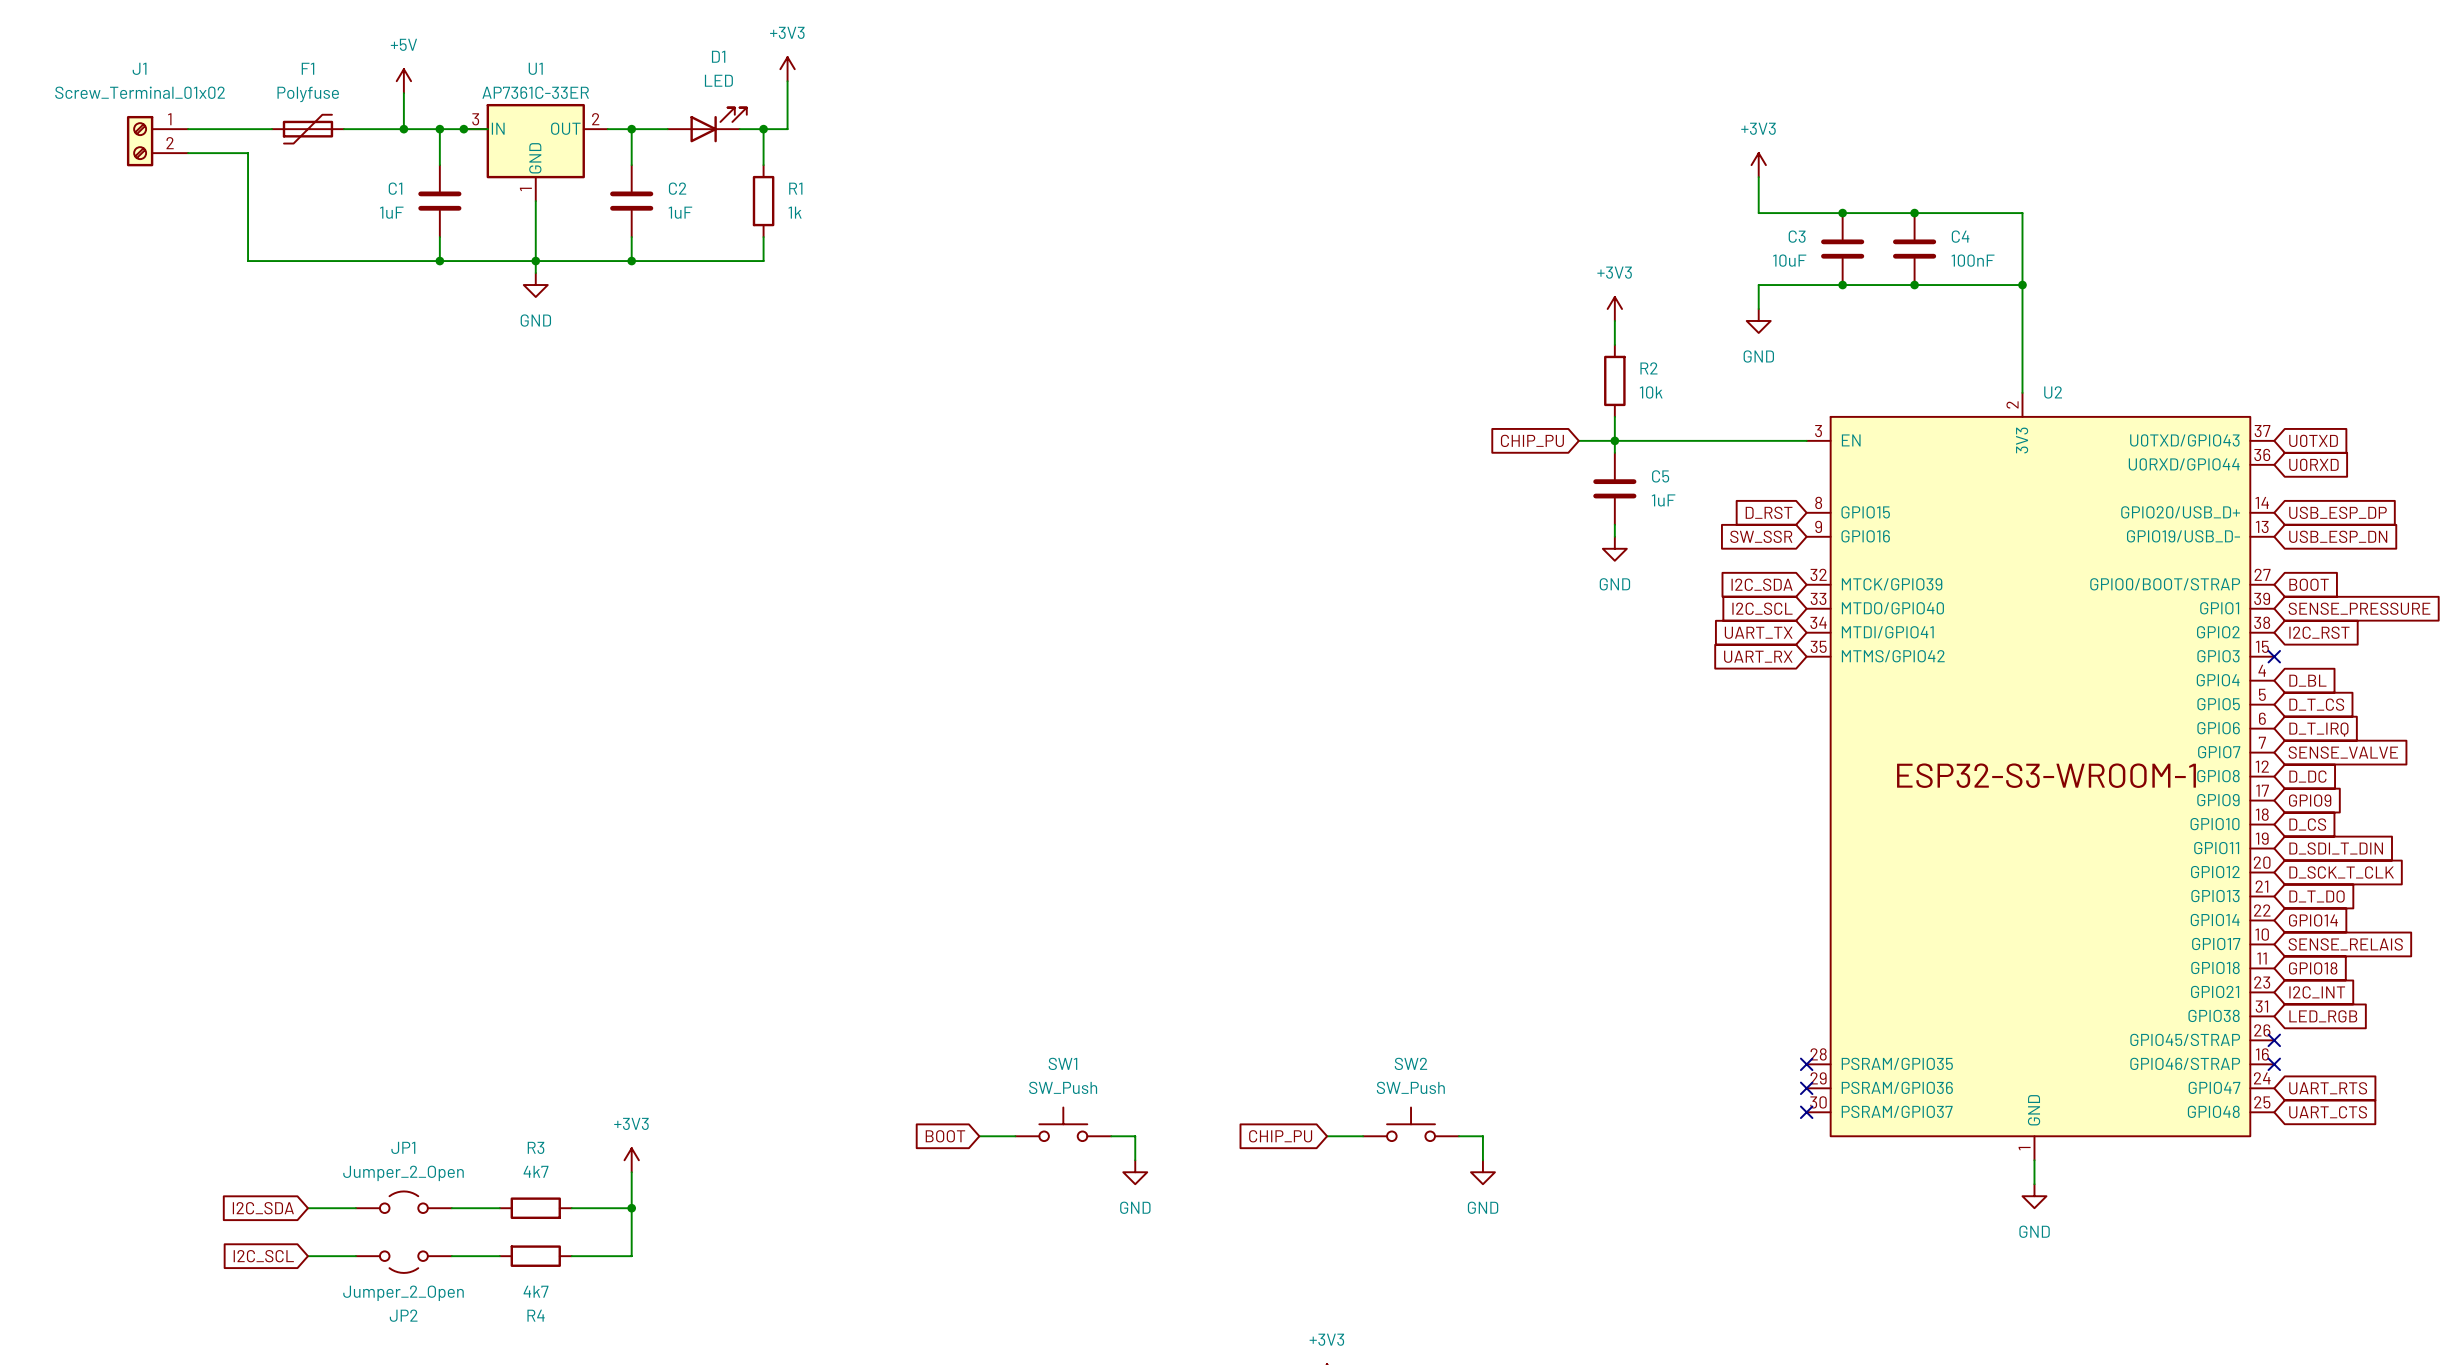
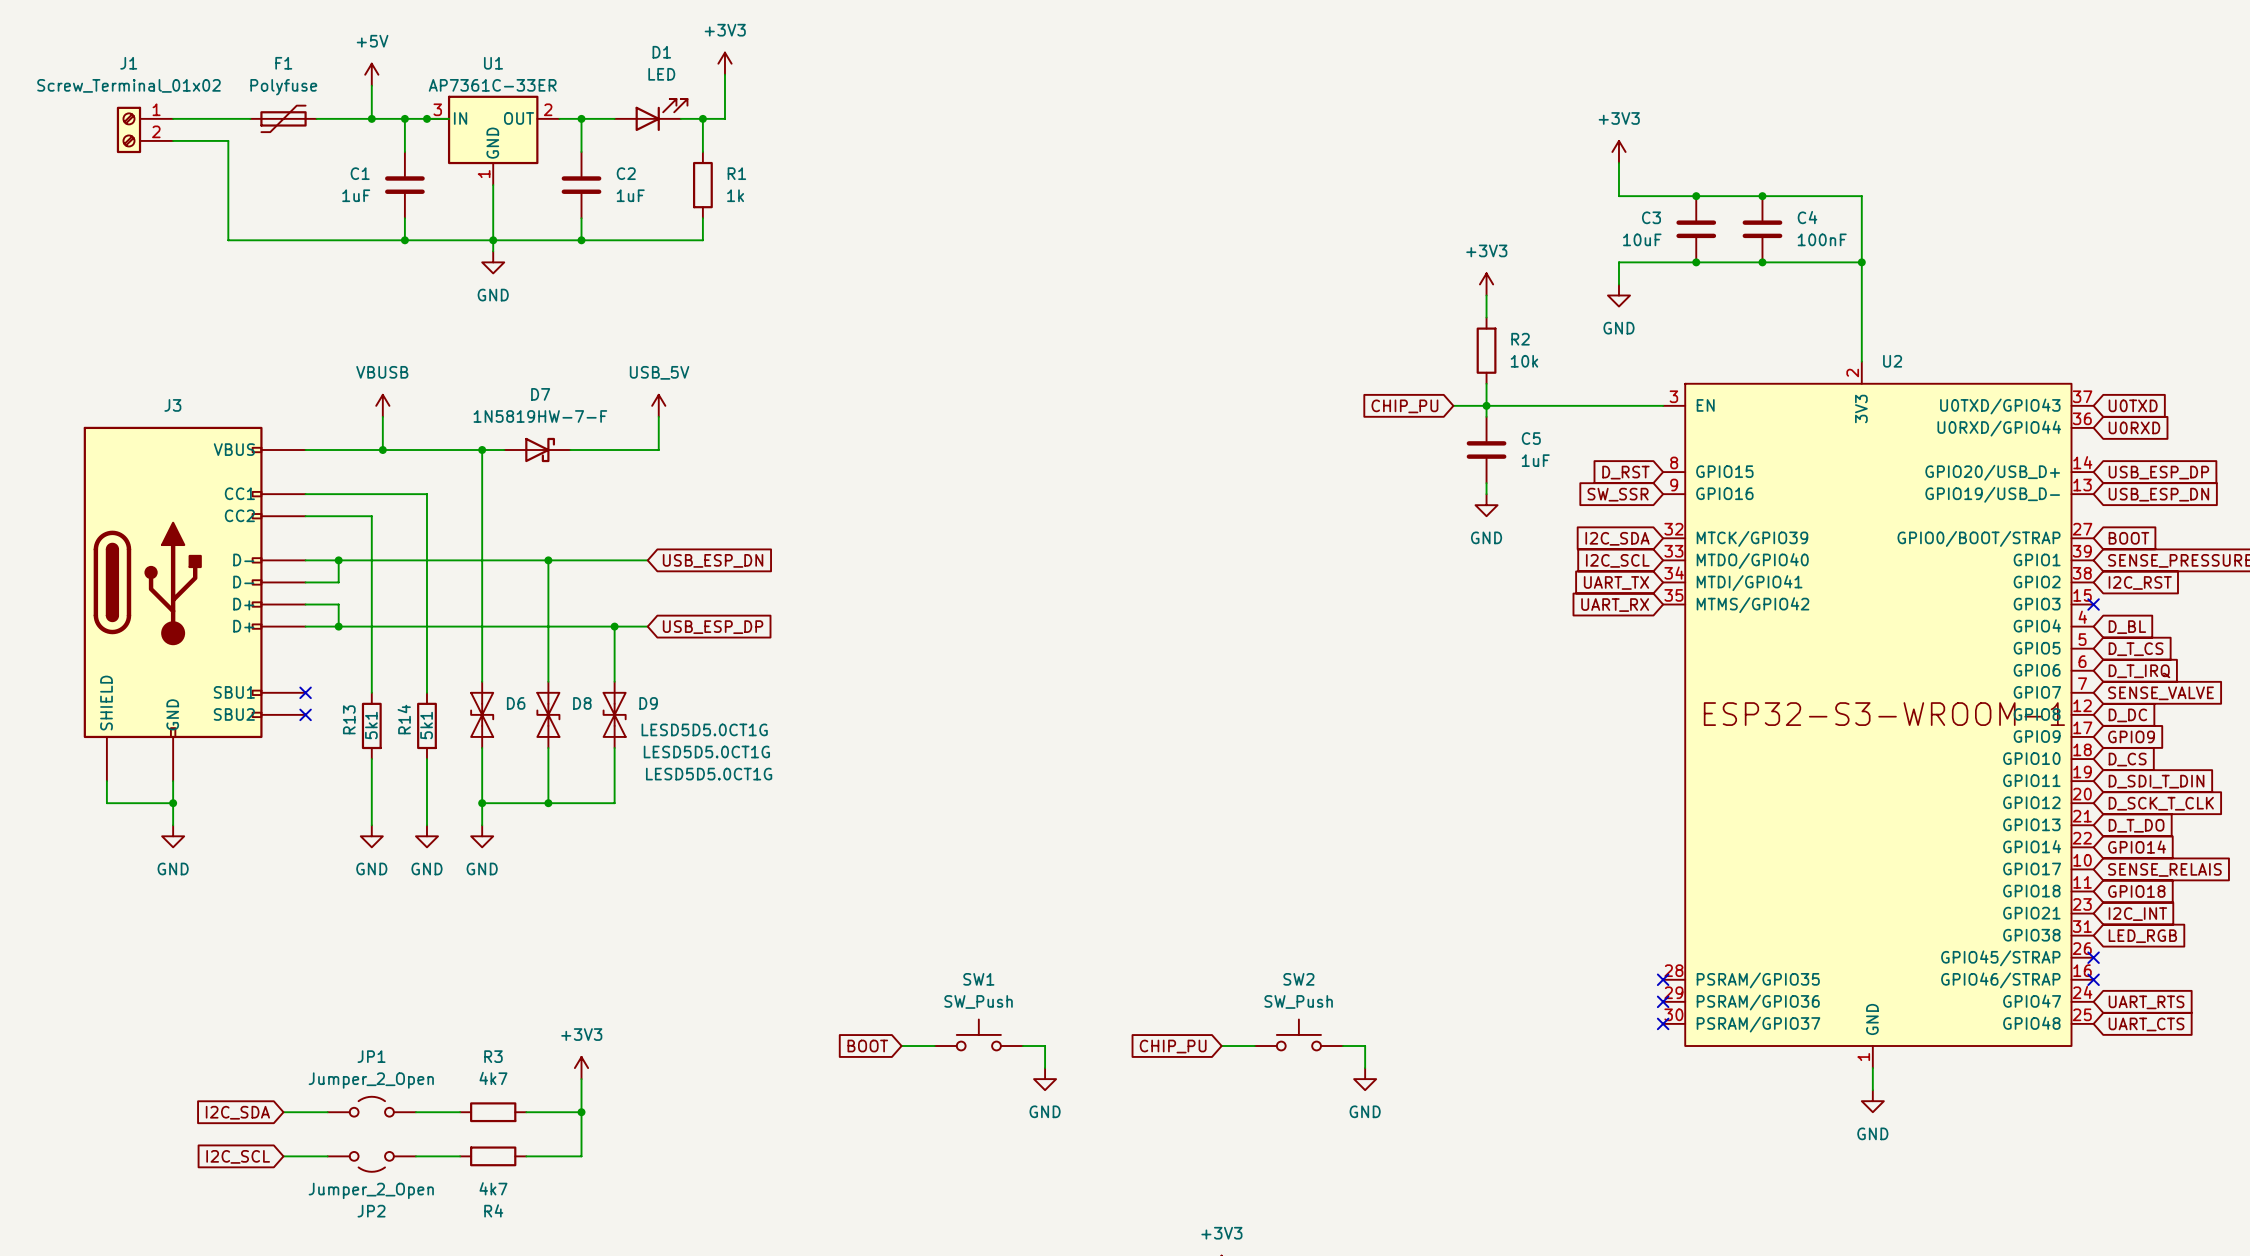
power symbol: none -> VBUSB (382, 405)
power symbol: none -> USB_5V (658, 405)
wire: none -> (382, 416) (382, 450)
wire: none -> (658, 416) (658, 450) (570, 450)
wire: none -> (305, 450) (504, 450)
junction: none -> (382, 450)
wire: none -> (482, 450) (482, 681)
junction: none -> (482, 450)
D7: none -> 1N5819HW-7-F (537, 450)
wire: none -> (305, 494) (426, 494) (426, 692)
wire: none -> (305, 516) (371, 516) (371, 692)
wire: none -> (305, 560) (647, 560)
wire: none -> (338, 560) (338, 582) (305, 582)
junction: none -> (338, 560)
wire: none -> (548, 560) (548, 681)
junction: none -> (548, 560)
global label: none -> USB_ESP_DN (713, 560)
J3: none -> (194, 603)
wire: none -> (305, 604) (338, 604) (338, 626)
wire: none -> (305, 626) (647, 626)
junction: none -> (338, 626)
wire: none -> (614, 626) (614, 681)
junction: none -> (614, 626)
global label: none -> USB_ESP_DP (713, 627)
no-connect mark: none -> (305, 692)
no-connect mark: none -> (305, 714)
D6: none -> LESD5D5.0CT1G (482, 714)
D8: none -> LESD5D5.0CT1G (548, 714)
D9: none -> LESD5D5.0CT1G (614, 714)
R13: none -> 5k1 (371, 725)
R14: none -> 5k1 (426, 725)
wire: none -> (482, 748) (482, 825)
wire: none -> (548, 748) (548, 803)
wire: none -> (614, 748) (614, 803) (482, 803)
wire: none -> (371, 759) (371, 825)
wire: none -> (426, 759) (426, 825)
wire: none -> (106, 781) (106, 803) (173, 803)
wire: none -> (173, 781) (173, 825)
junction: none -> (173, 803)
junction: none -> (482, 803)
junction: none -> (548, 803)
power symbol: none -> GND (173, 836)
power symbol: none -> GND (371, 836)
power symbol: none -> GND (426, 836)
power symbol: none -> GND (482, 836)

